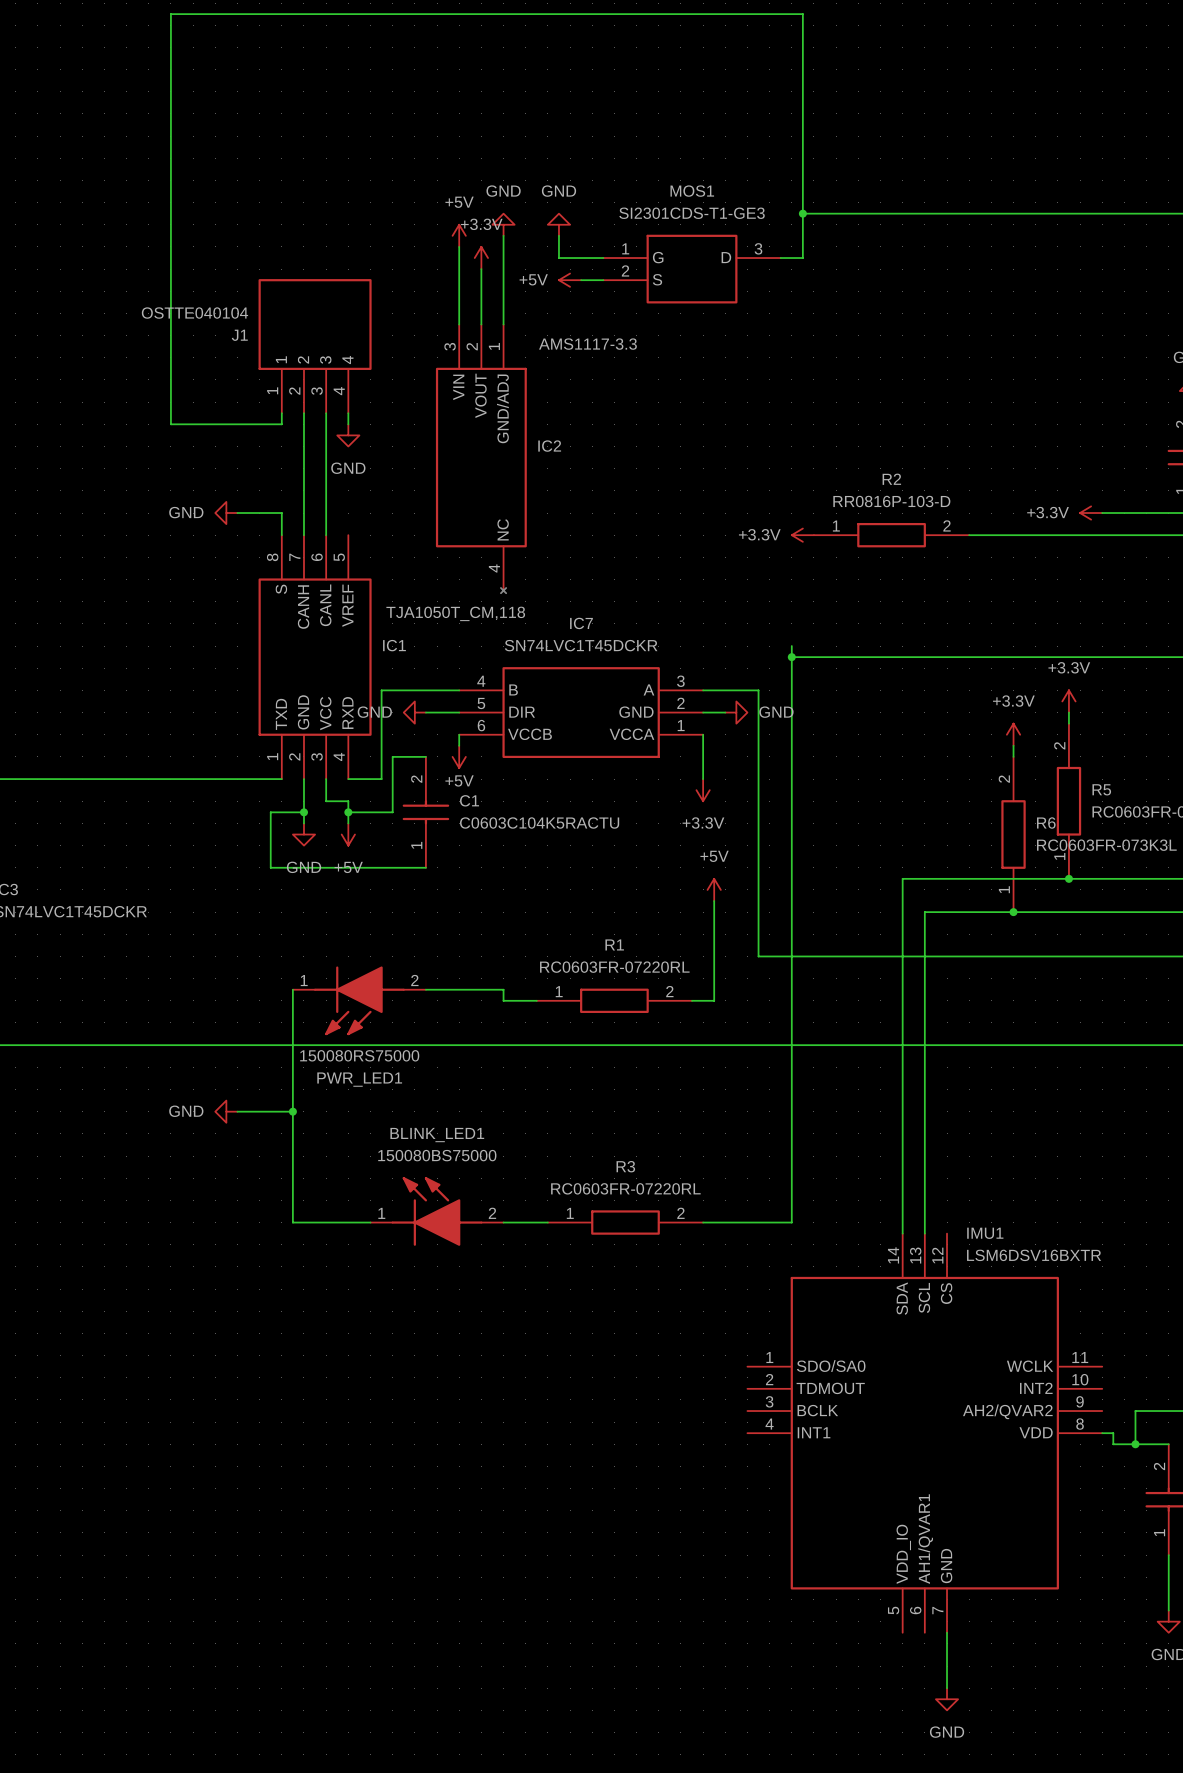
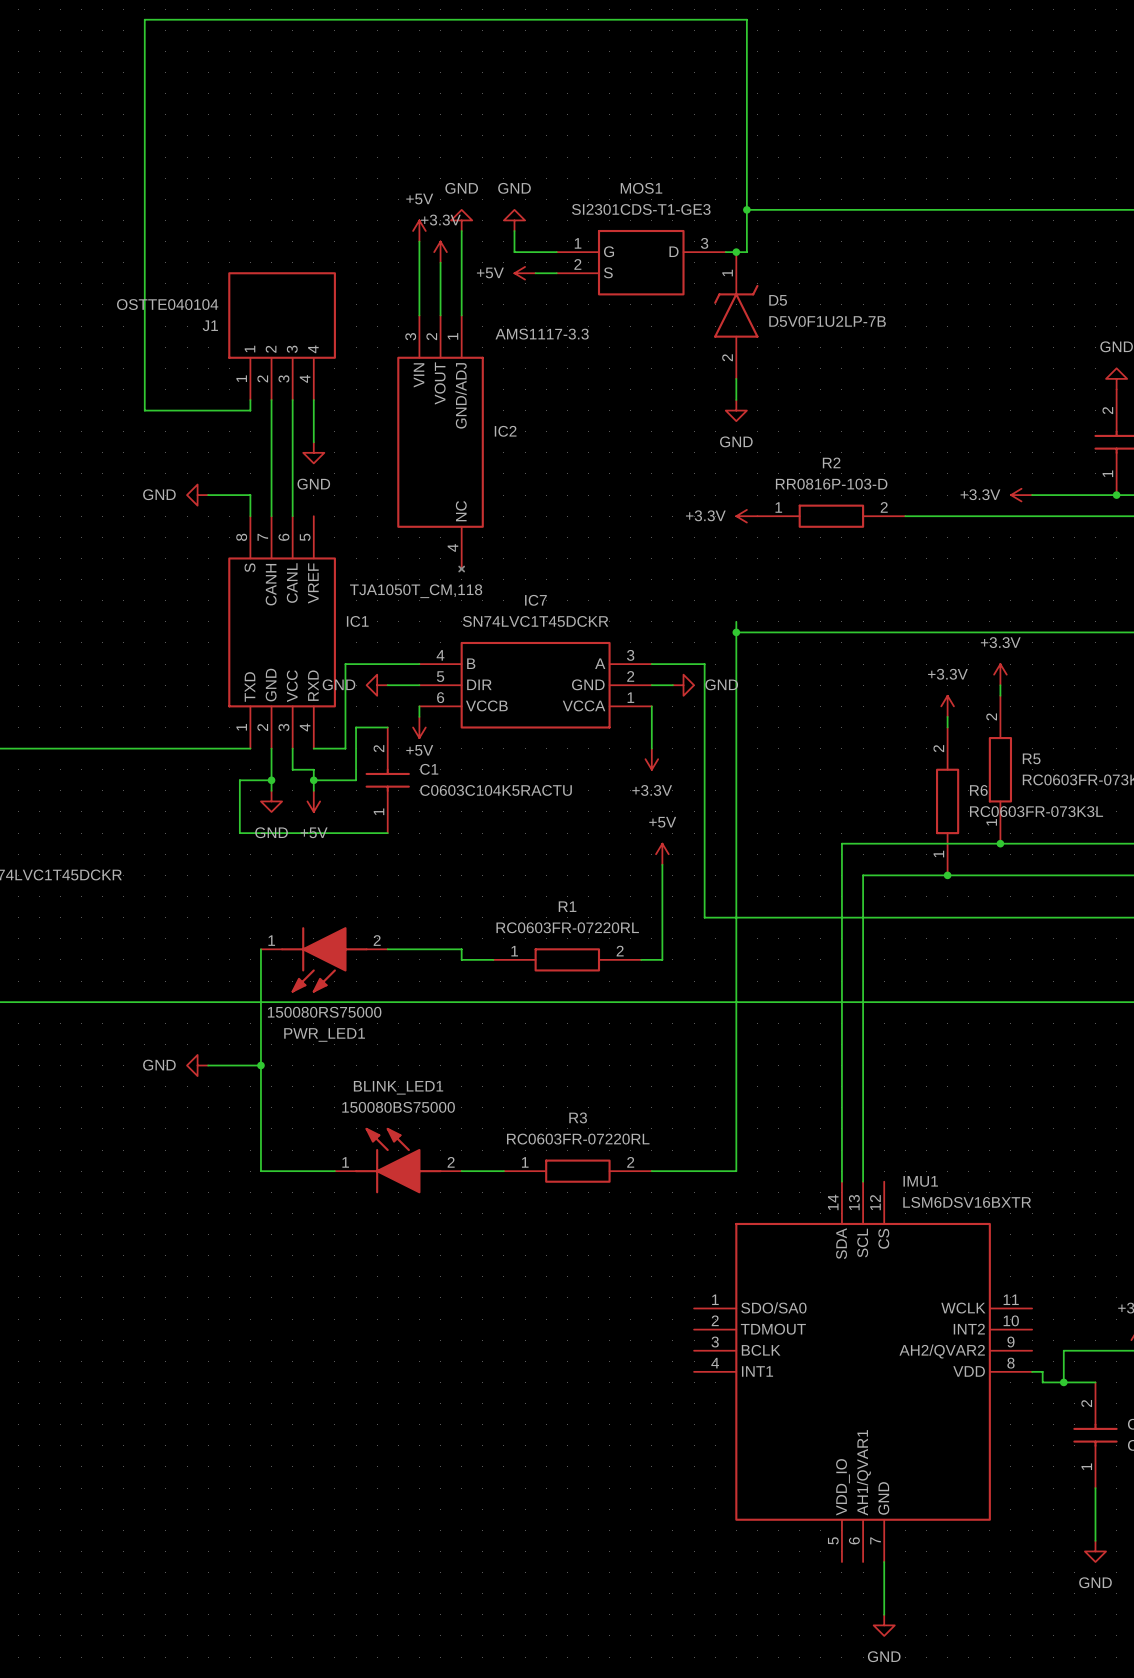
junction: none -> (736, 252)
D5: none -> D5V0F1U2LP-7B (736, 315)
wire: none -> (736, 378) (736, 400)
wire: none -> (313, 410) (313, 442)
power symbol: none -> GND (736, 410)
power symbol position: GND (348, 435) -> GND (313, 452)

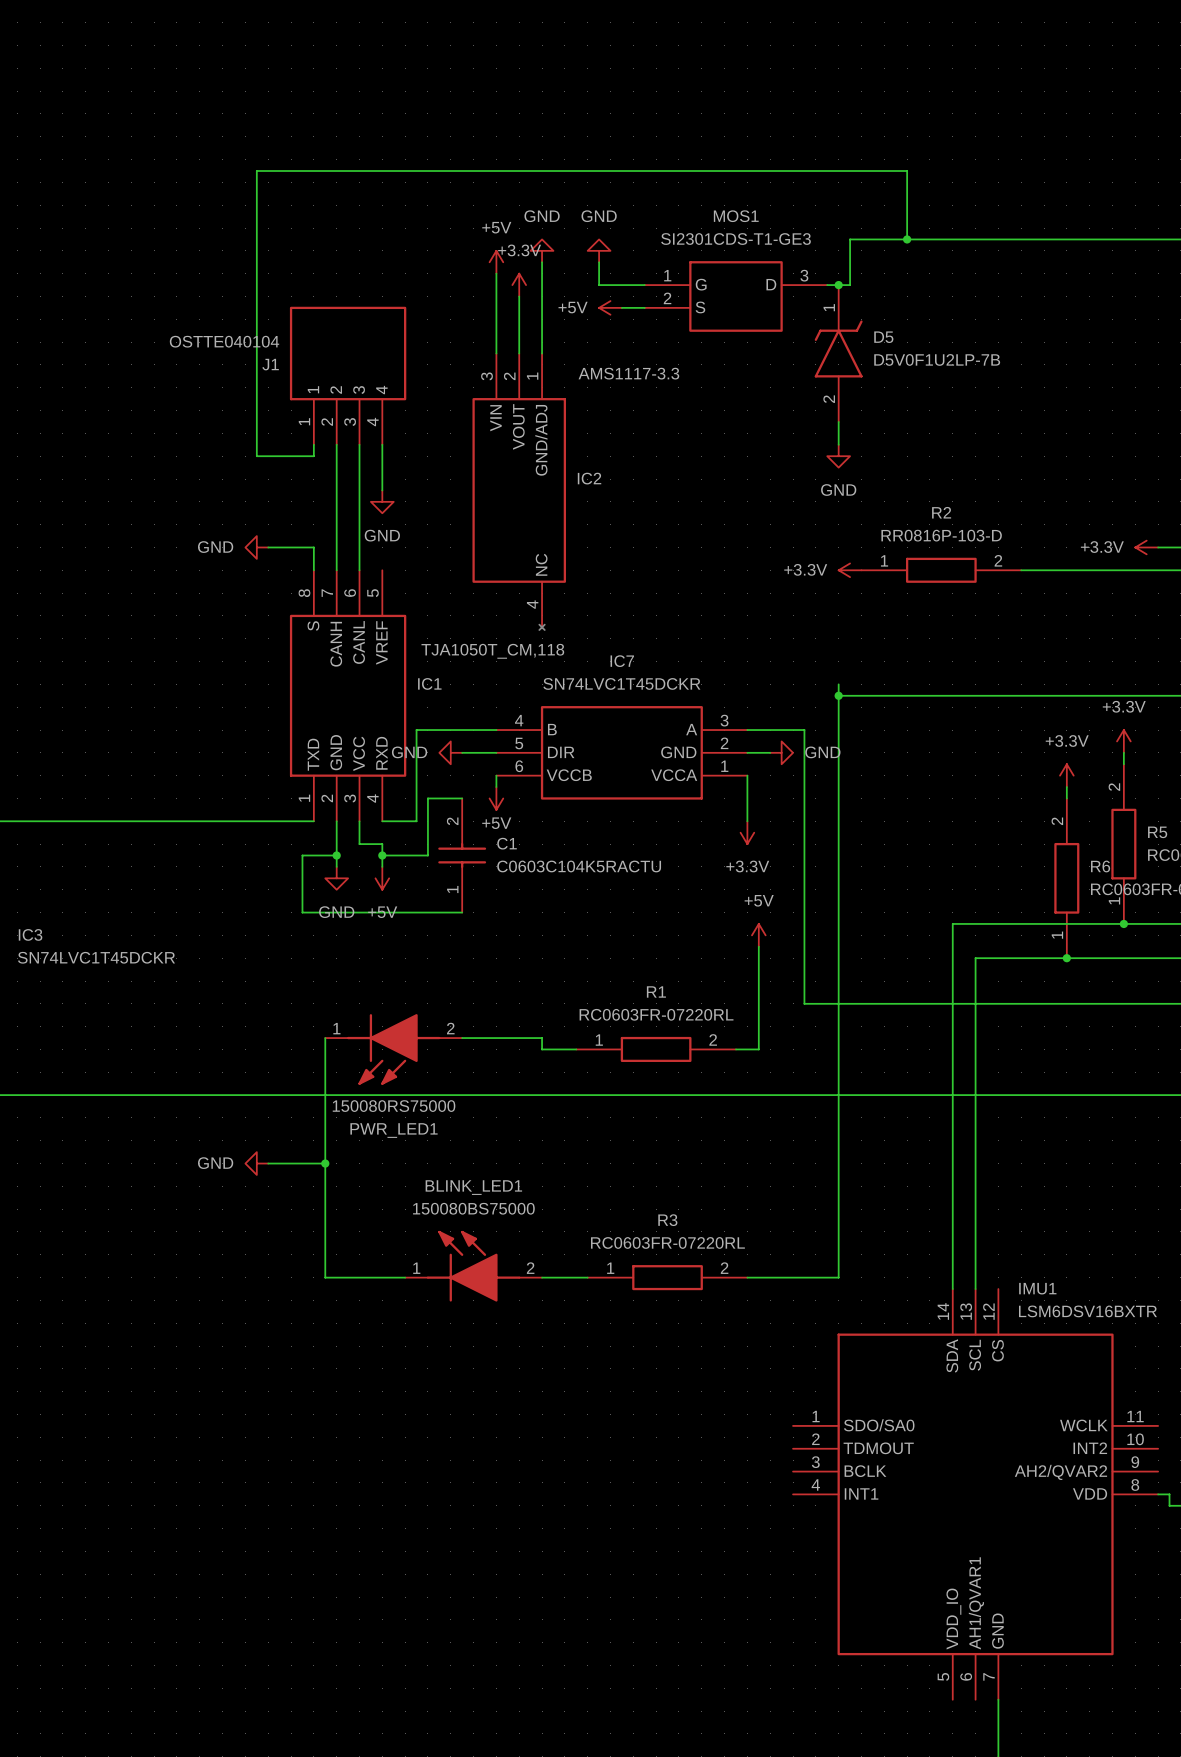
wire: (746, 209) (746, 19) (144, 19) (144, 410) (197, 410) -> (907, 239) (907, 170) (256, 170) (256, 456)
junction: (746, 209) -> none
junction: none -> (907, 239)

